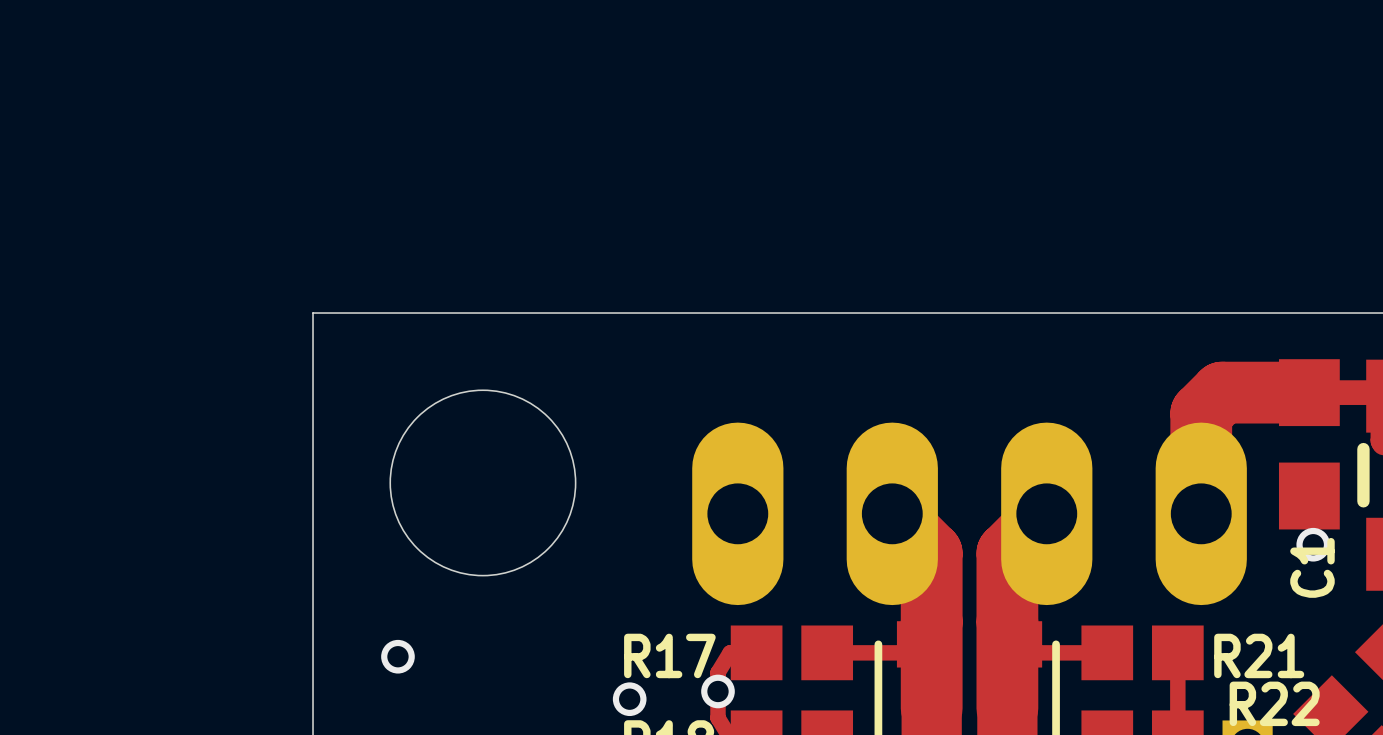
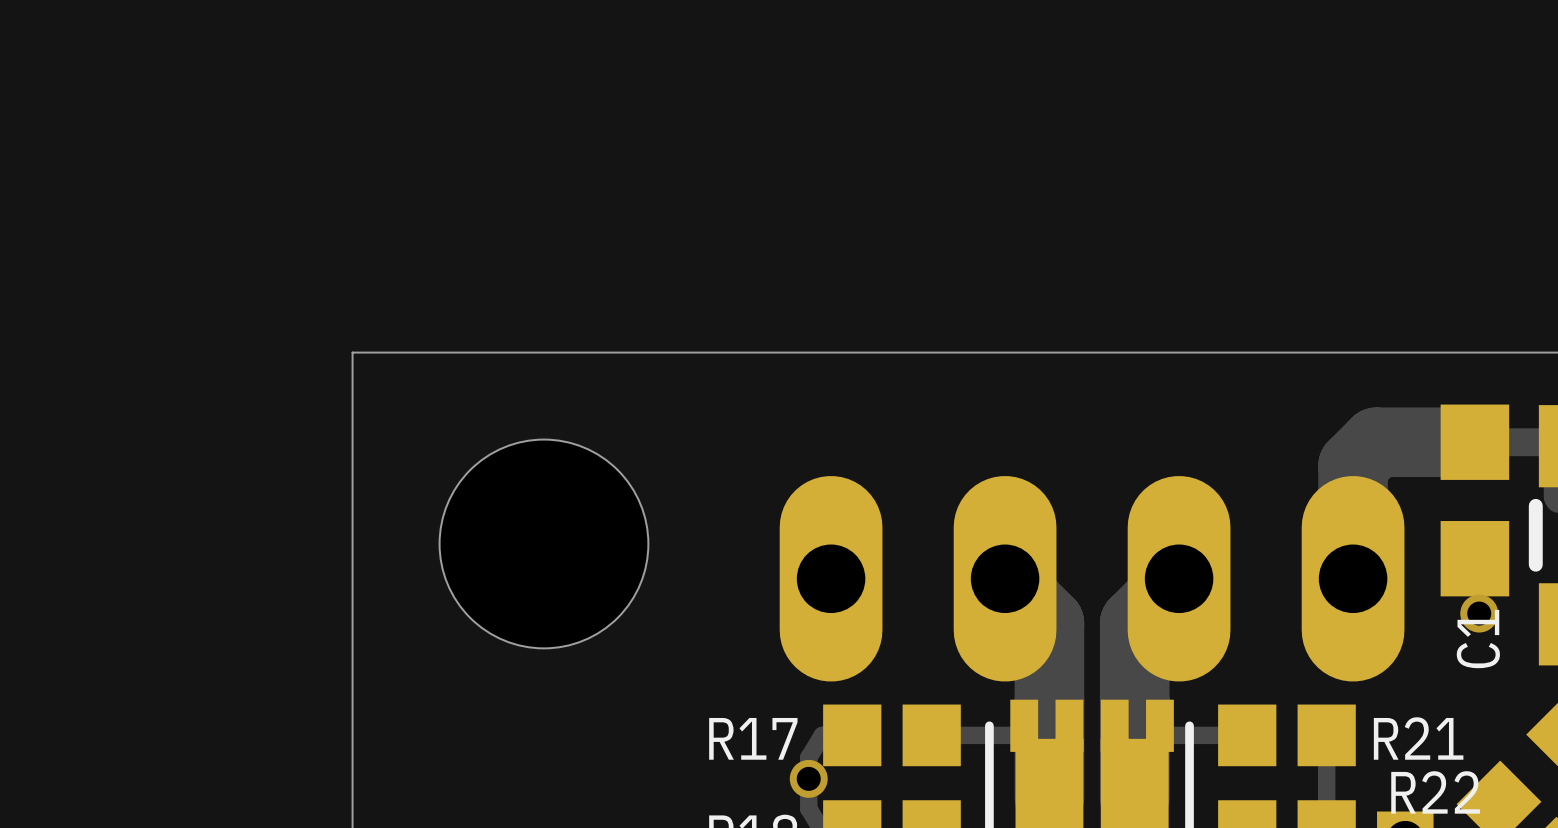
via: (397, 656) -> none
via: (629, 699) -> none

